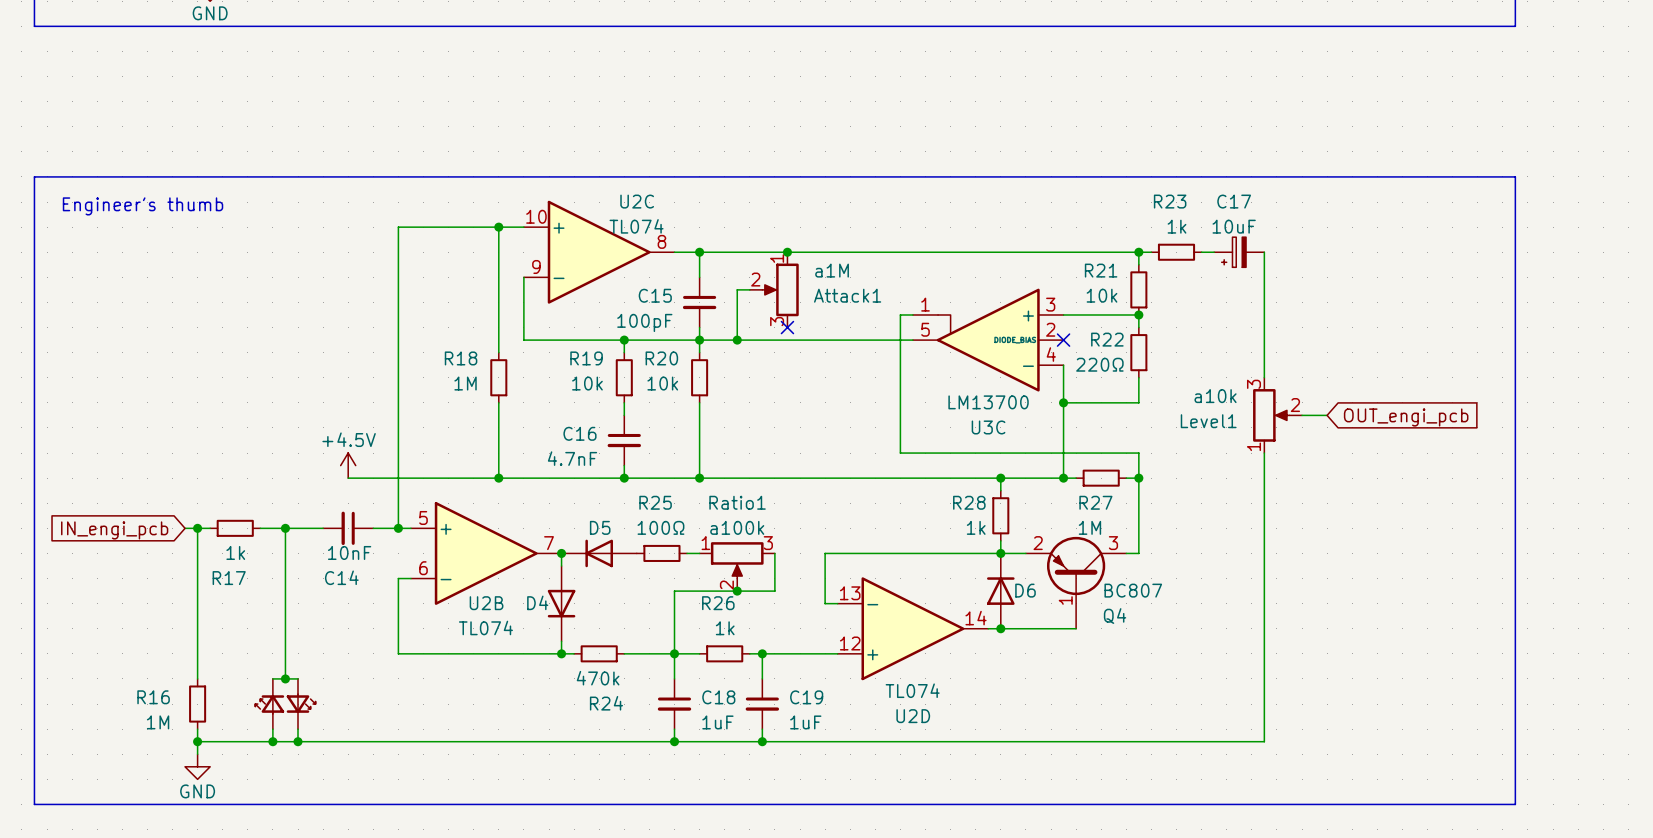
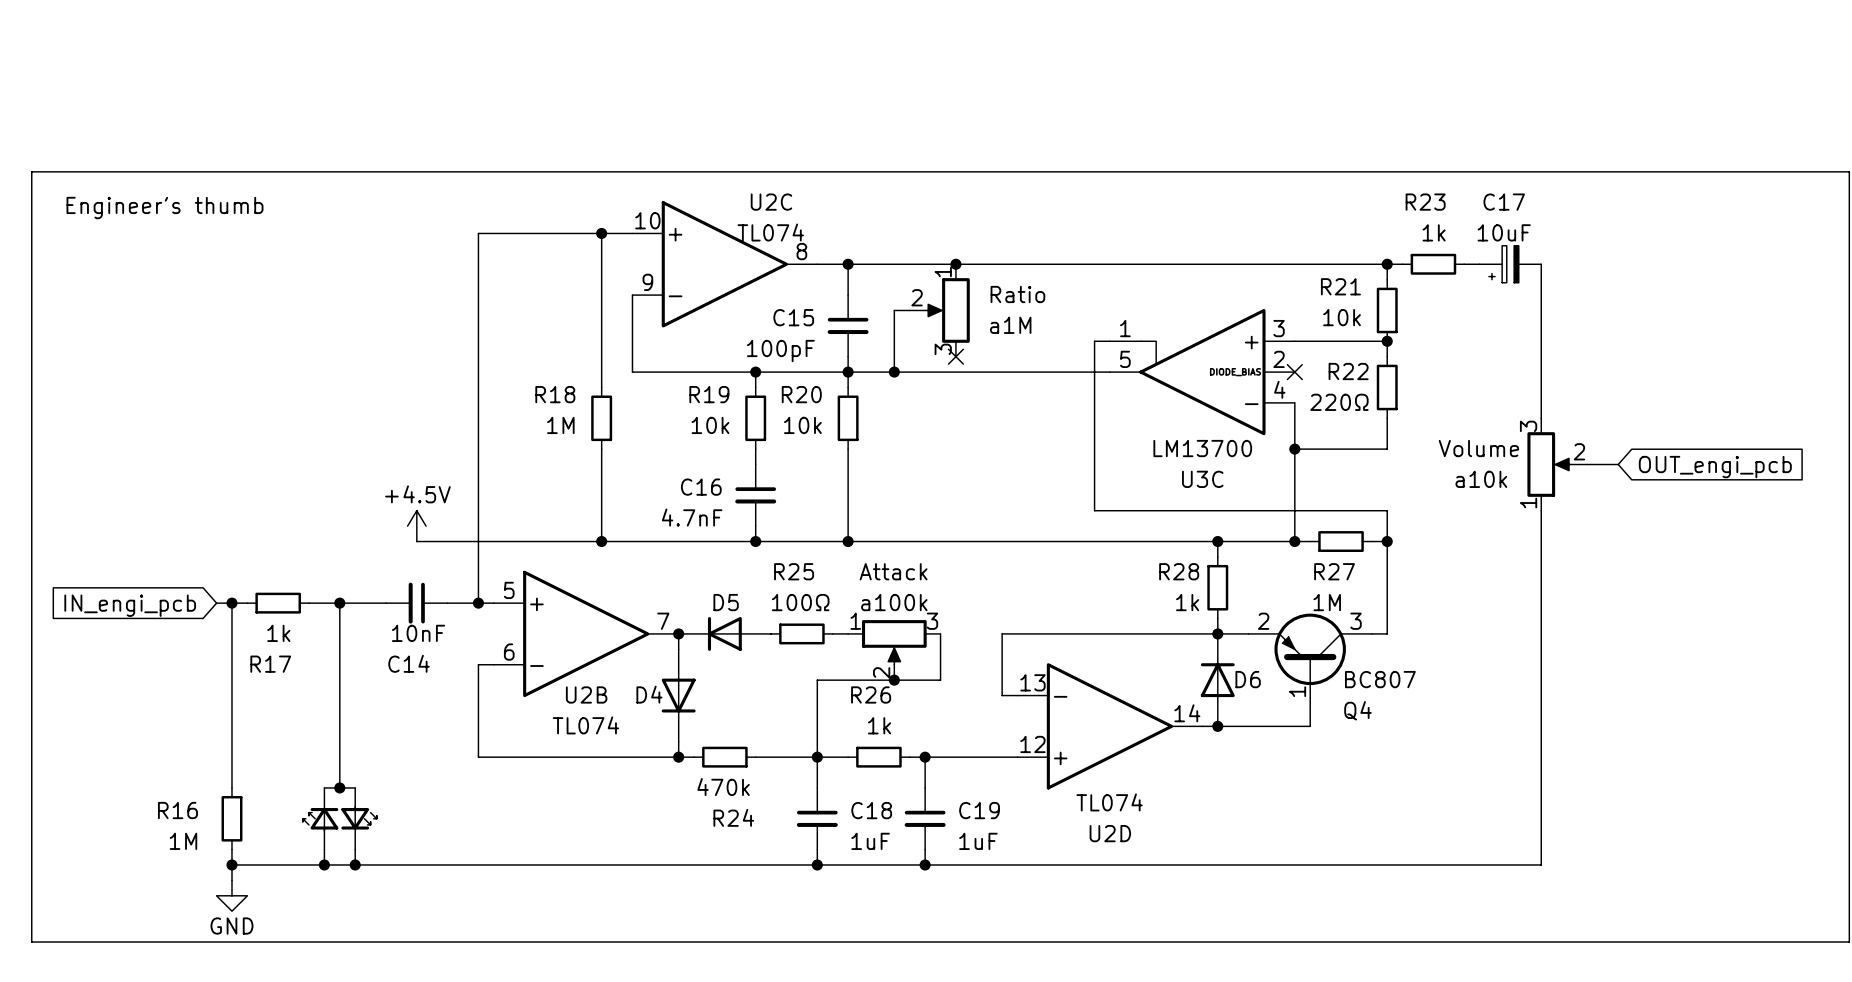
Attack1 value position: a1M (832, 270) -> a1M (1010, 325)
Attack1 text: none -> Ratio (1017, 294)
Attack1 name: Attack1 (847, 295) -> none
Level1 value position: a10k (1215, 396) -> a10k (1481, 479)
Level1 text: none -> Volume (1478, 448)
Level1 name: Level1 (1208, 421) -> none
Ratio1 text: none -> Attack (893, 571)
Ratio1 name: Ratio1 (737, 502) -> none

